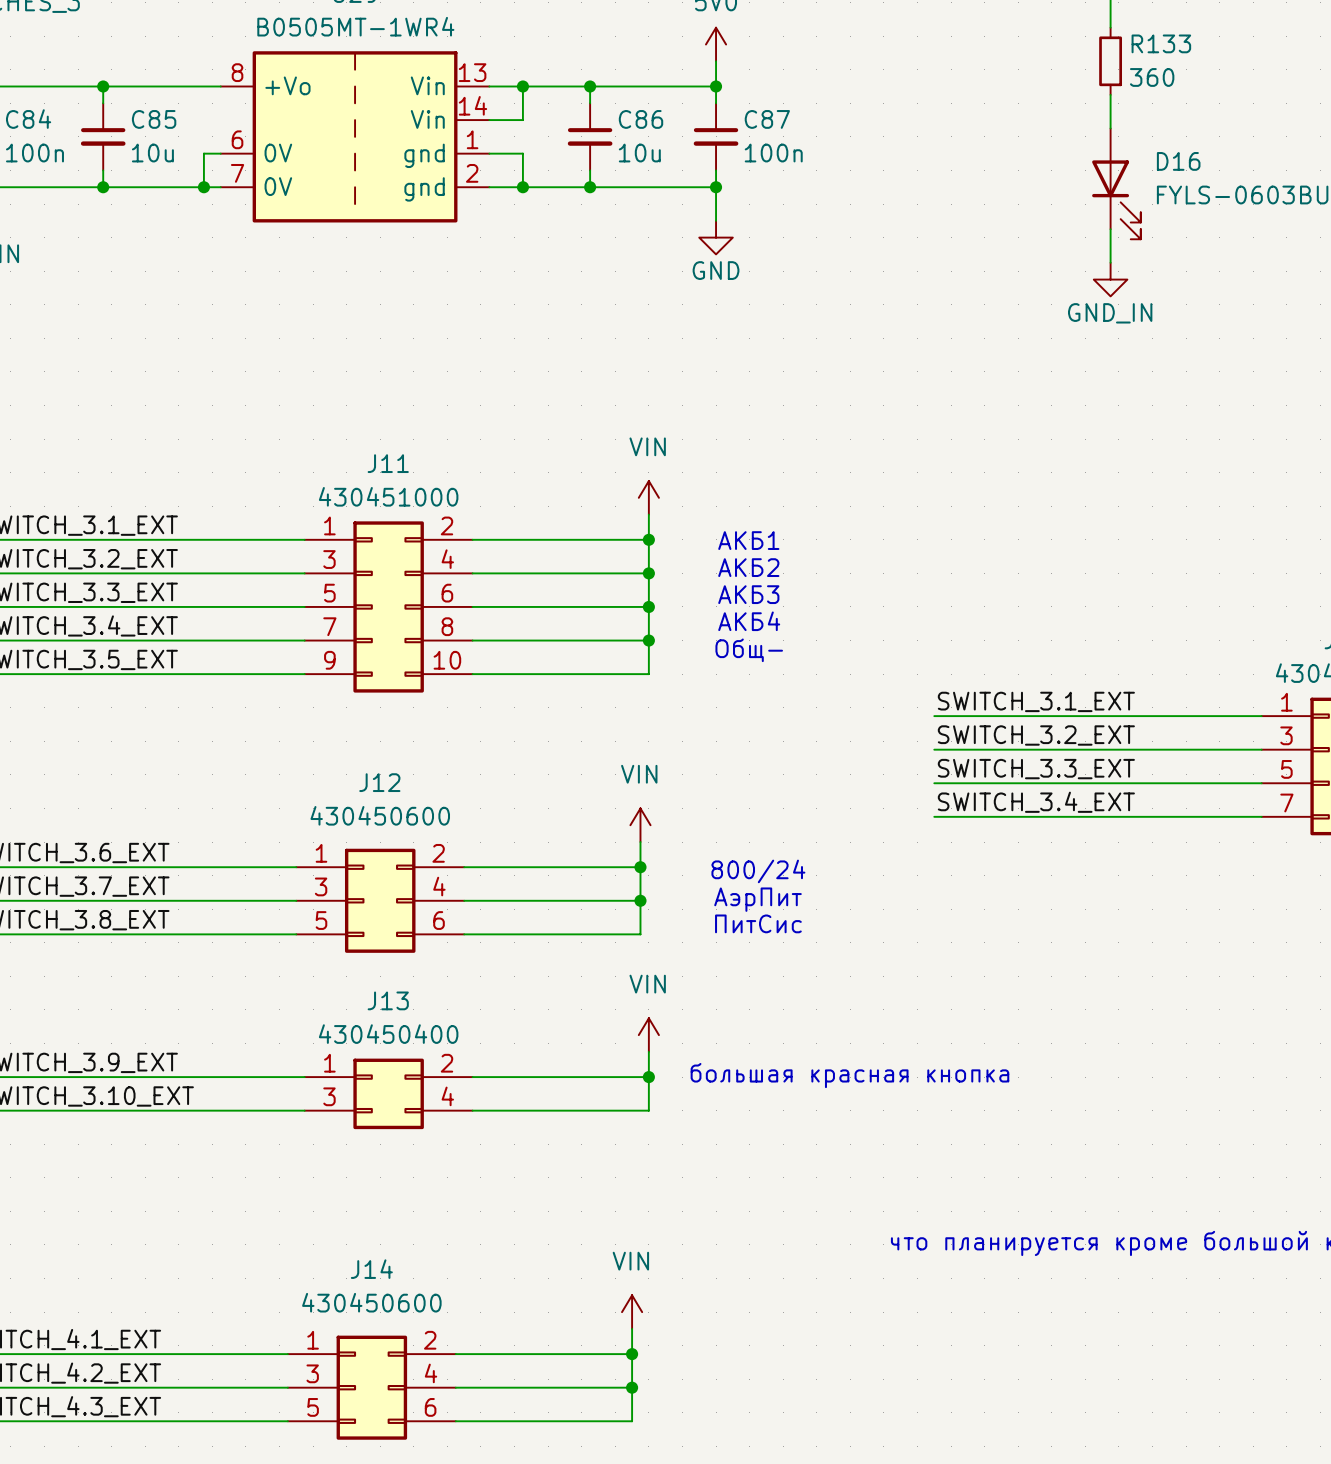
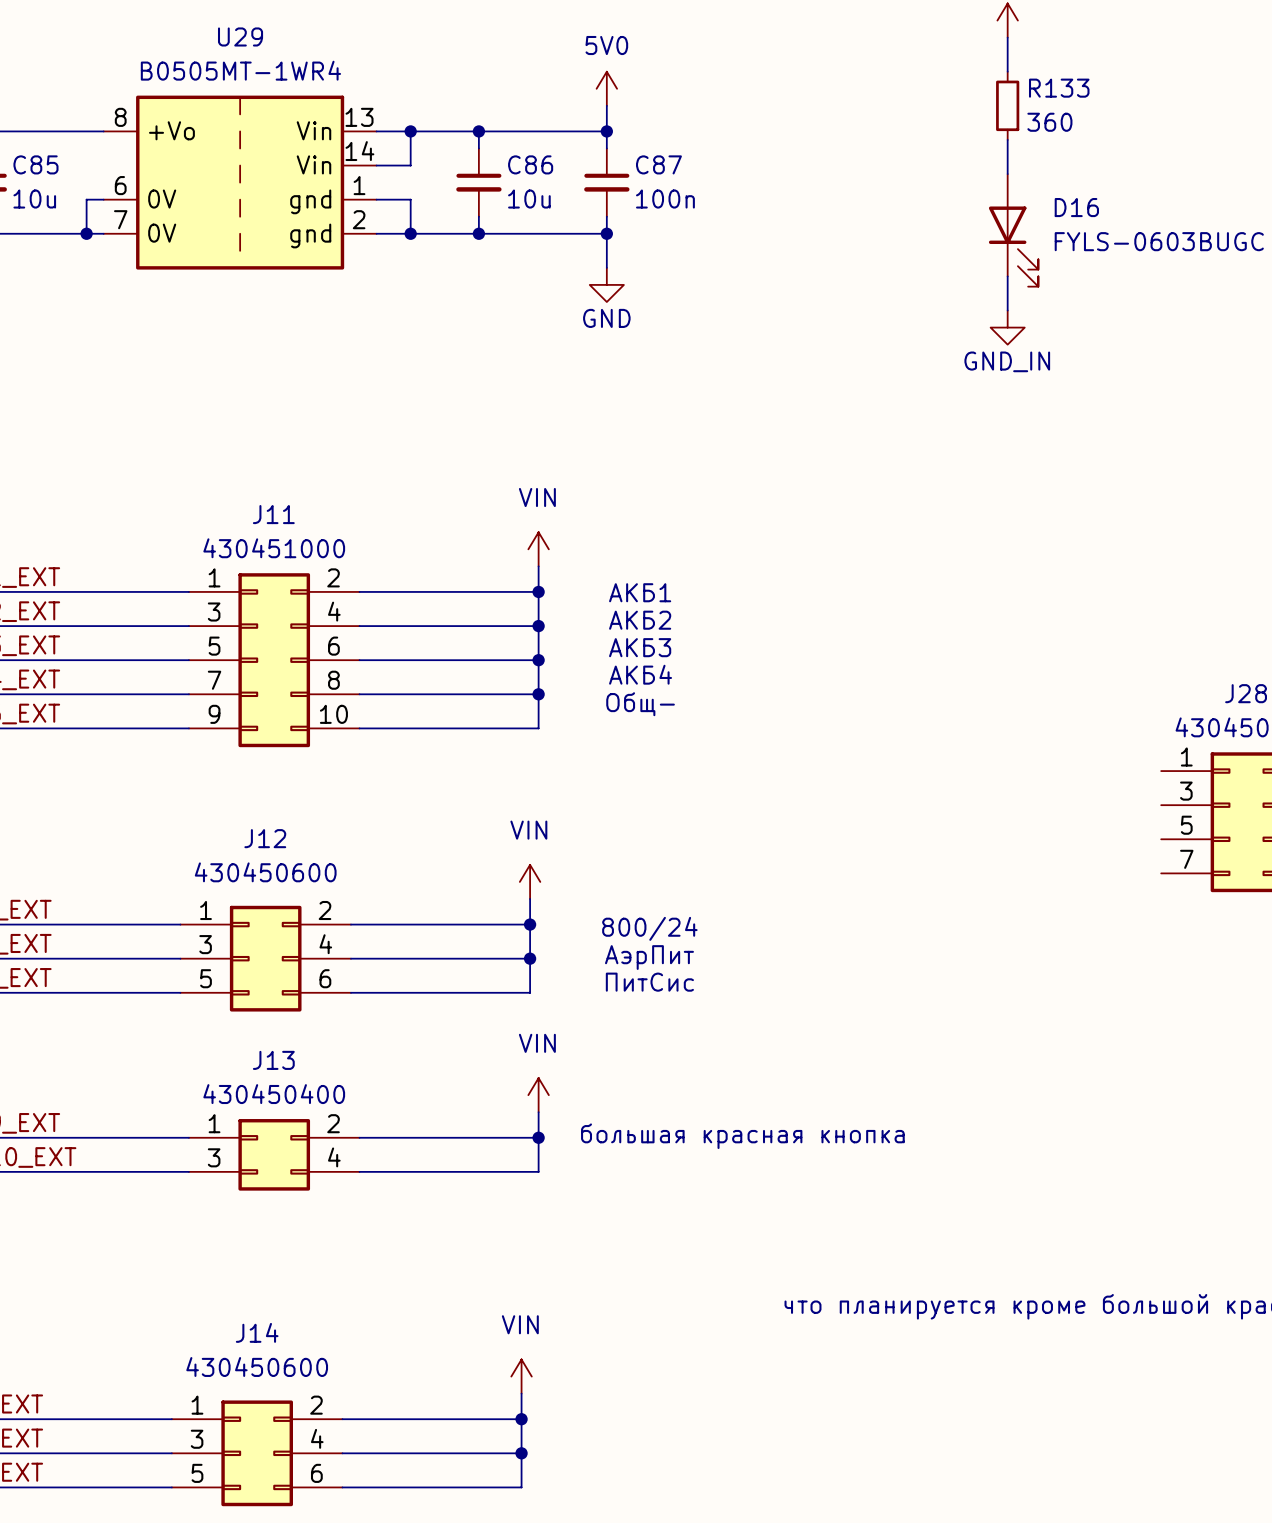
label: SWITCH_3.1_EXT (1036, 701) -> none
wire: (934, 716) (1261, 716) -> none
label: SWITCH_3.2_EXT (1036, 735) -> none
wire: (934, 749) (1261, 749) -> none
label: SWITCH_3.3_EXT (1036, 769) -> none
wire: (934, 783) (1261, 783) -> none
label: SWITCH_3.4_EXT (1036, 802) -> none
wire: (934, 816) (1261, 816) -> none

